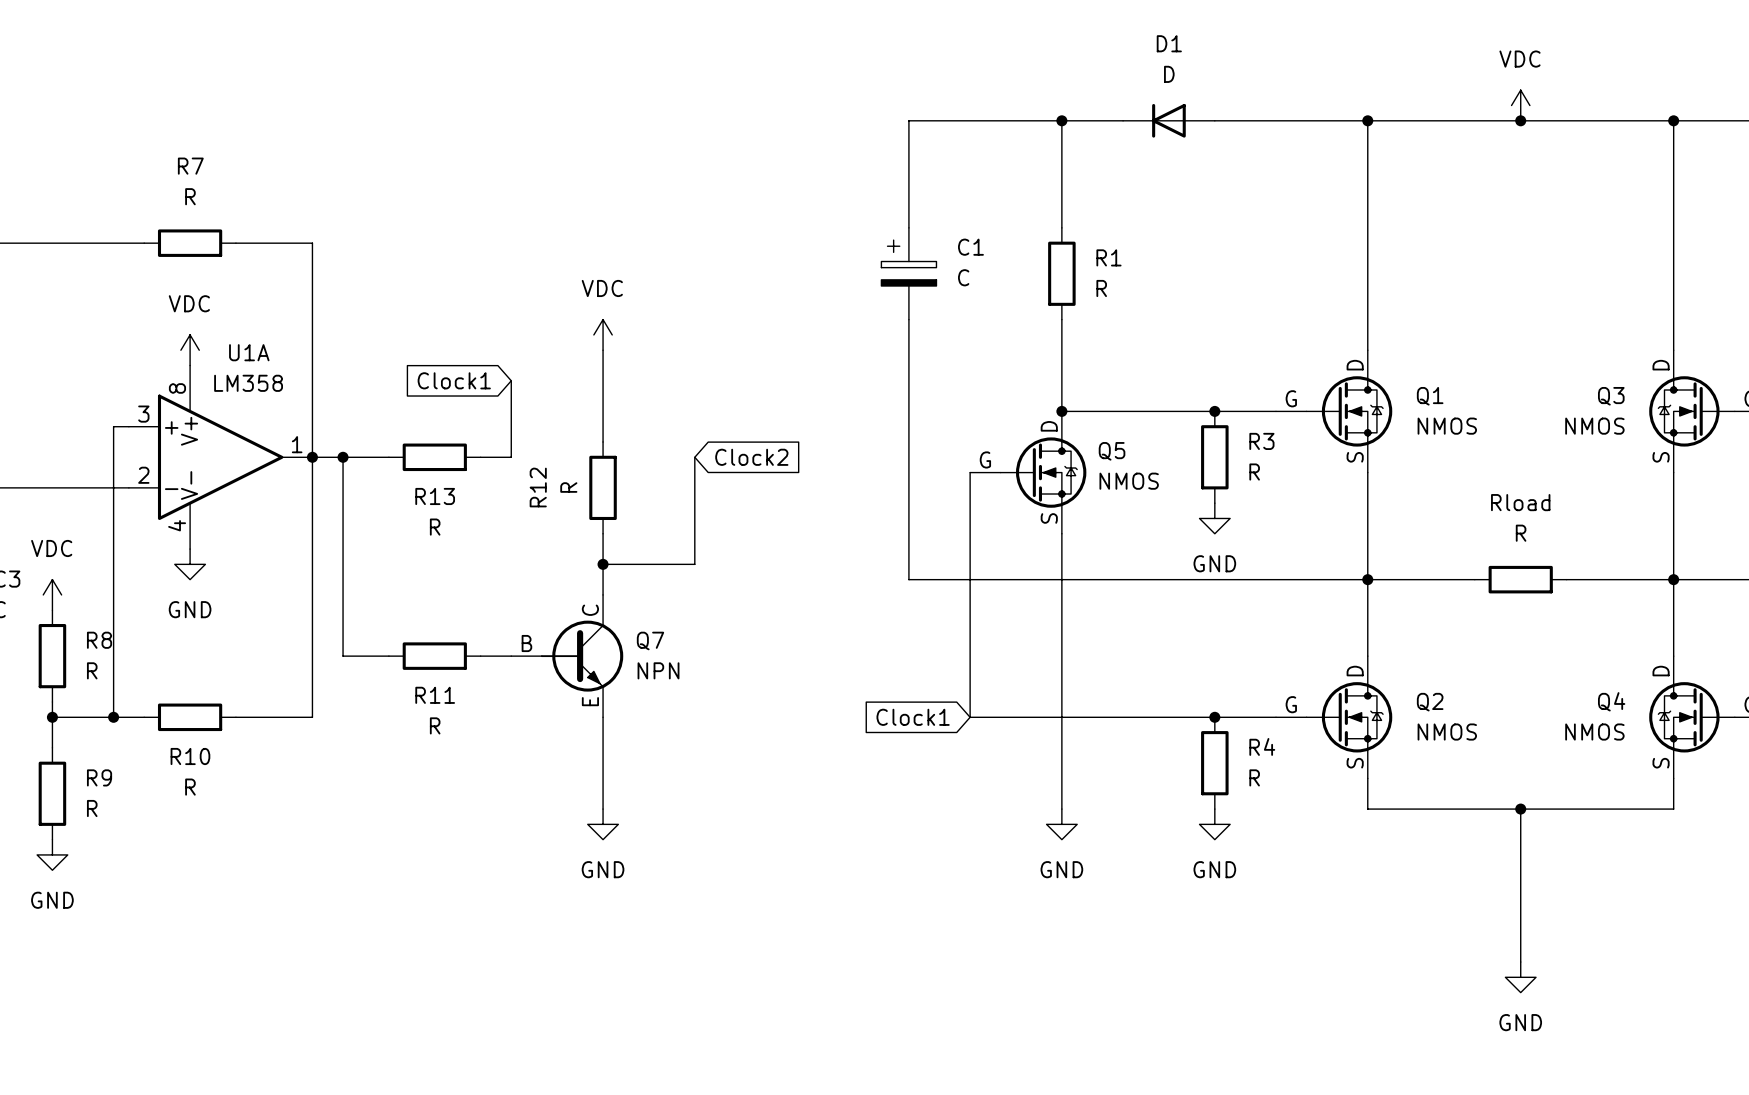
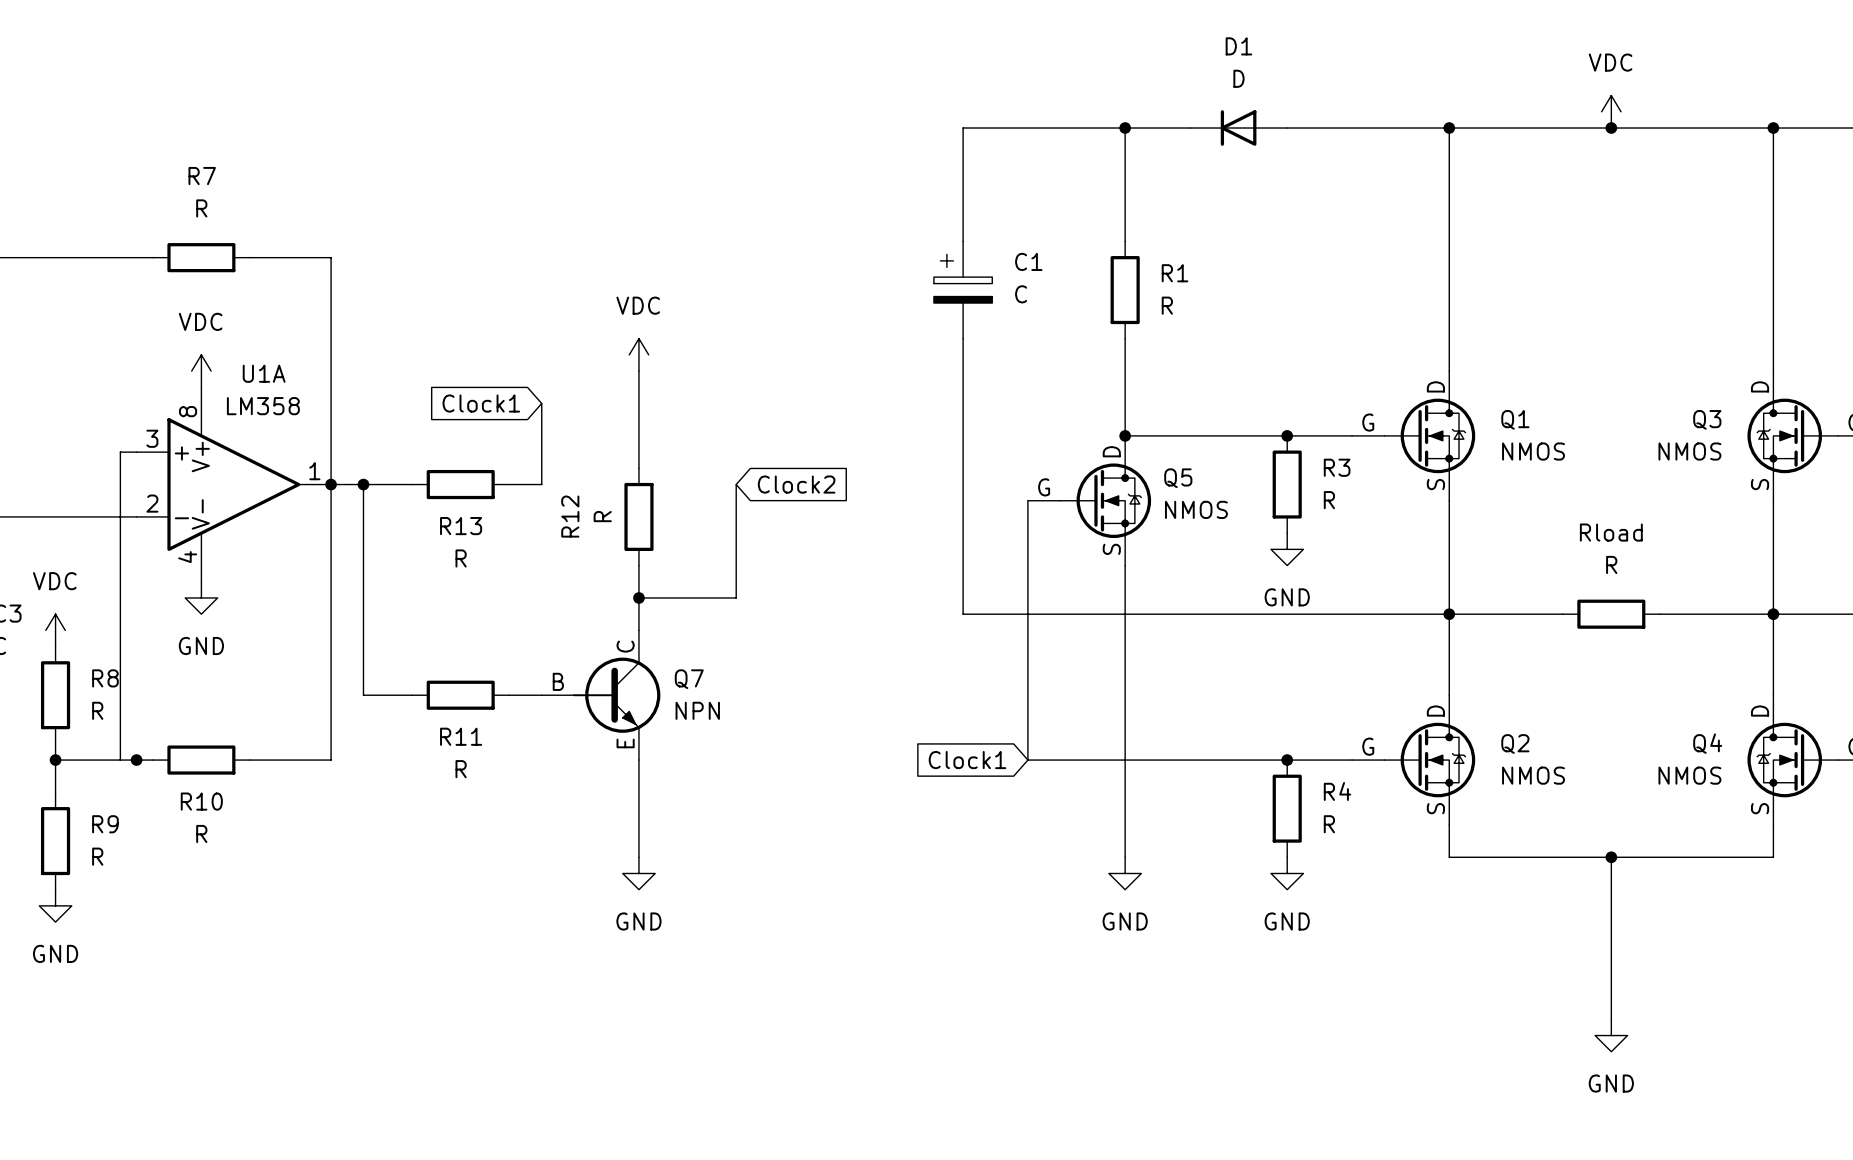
junction position: (113, 717) -> (136, 760)

